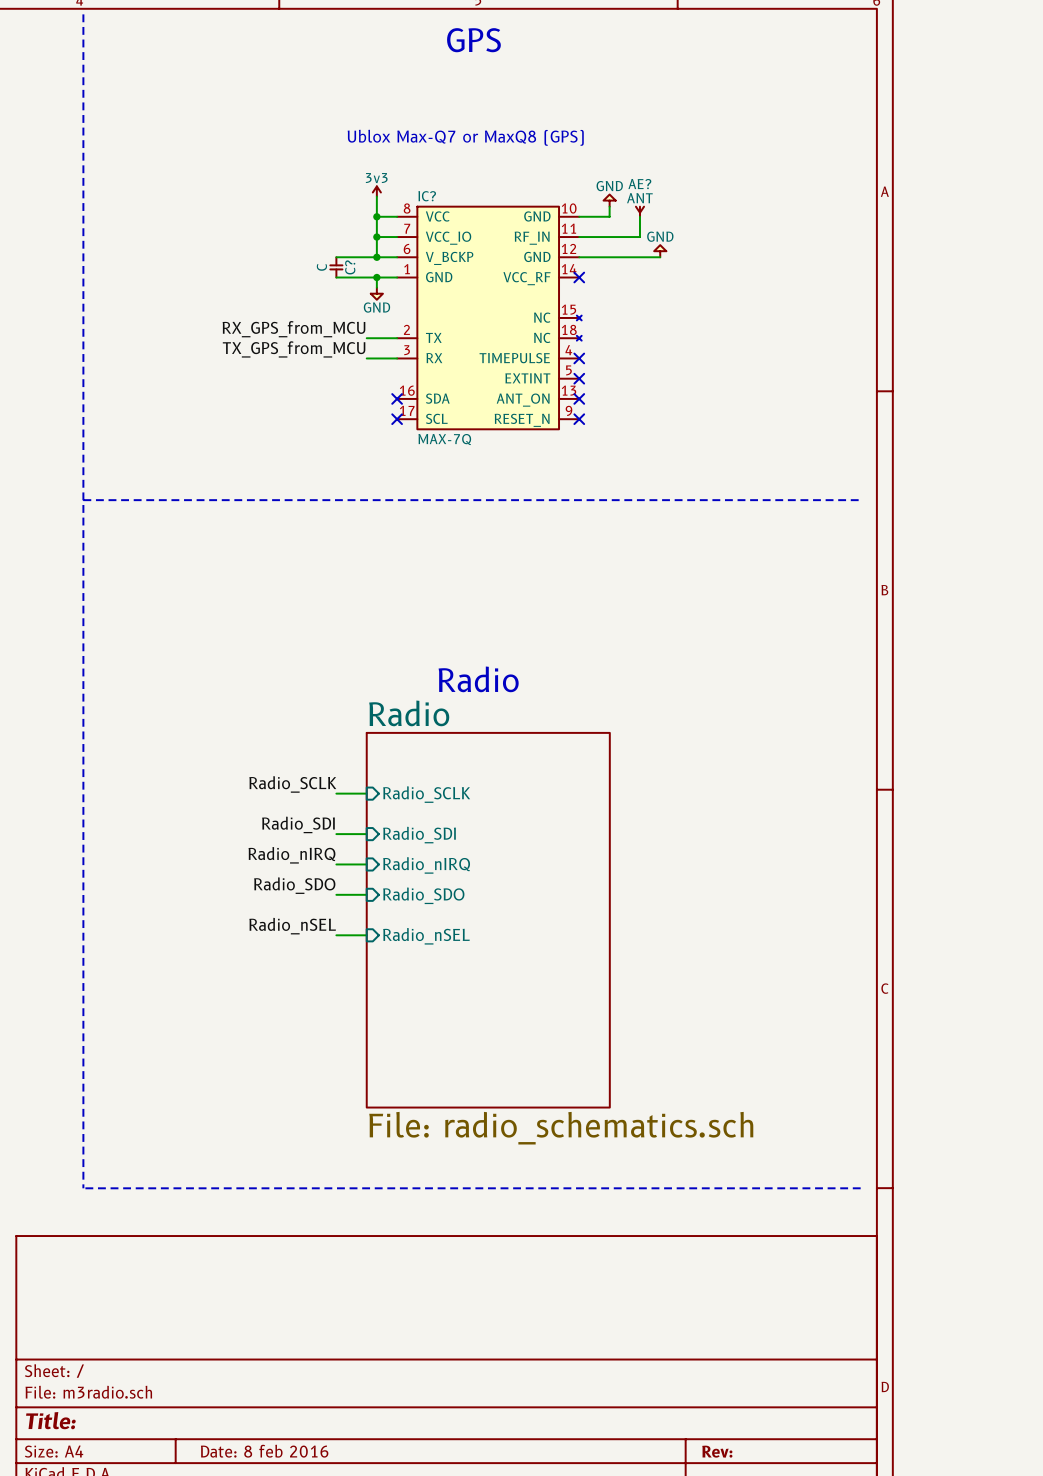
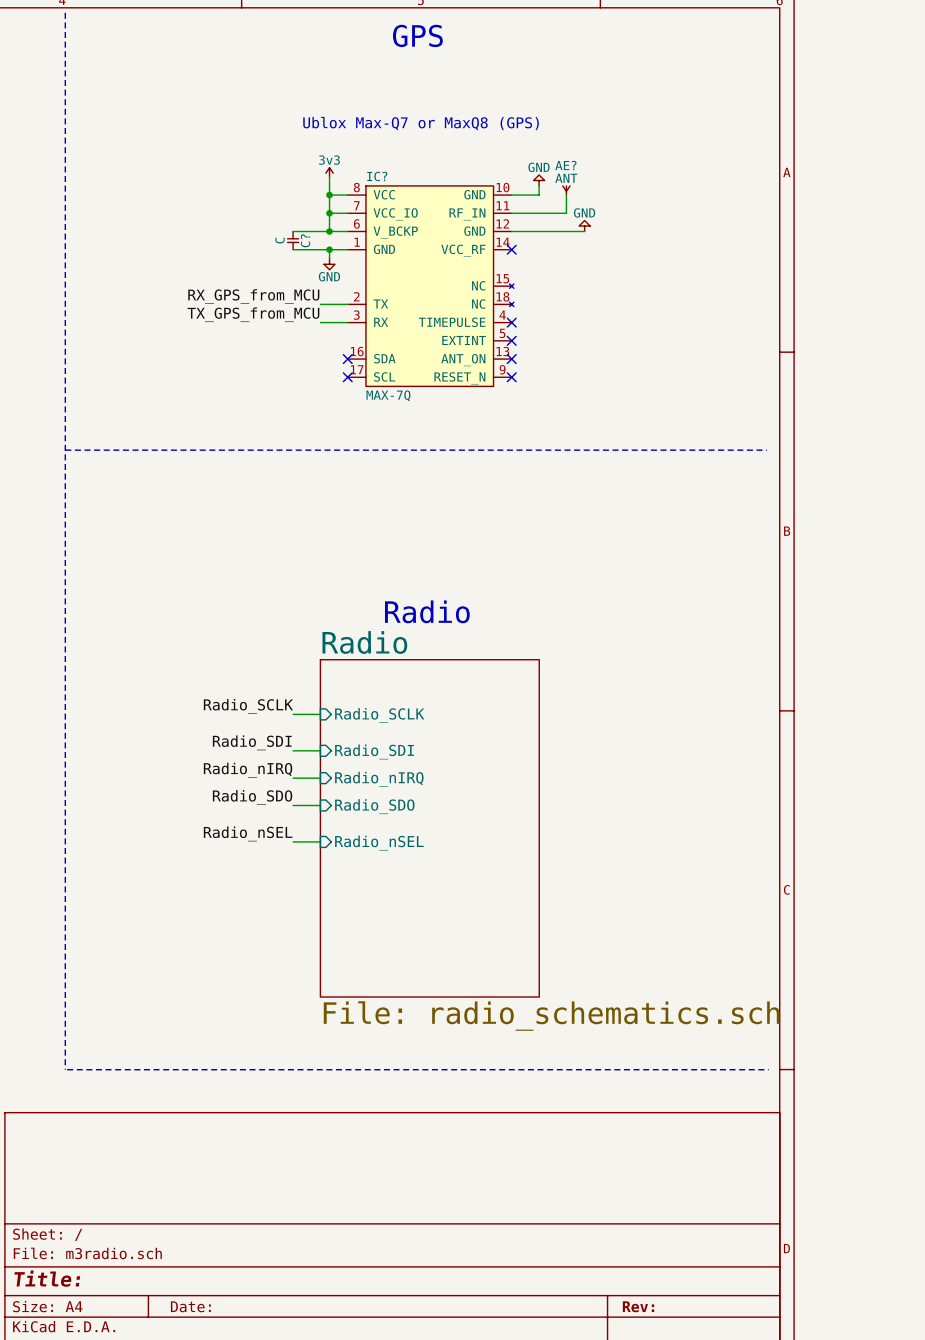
title block: Date: 8 feb 2016 (264, 1451) -> Date: (190, 1306)

